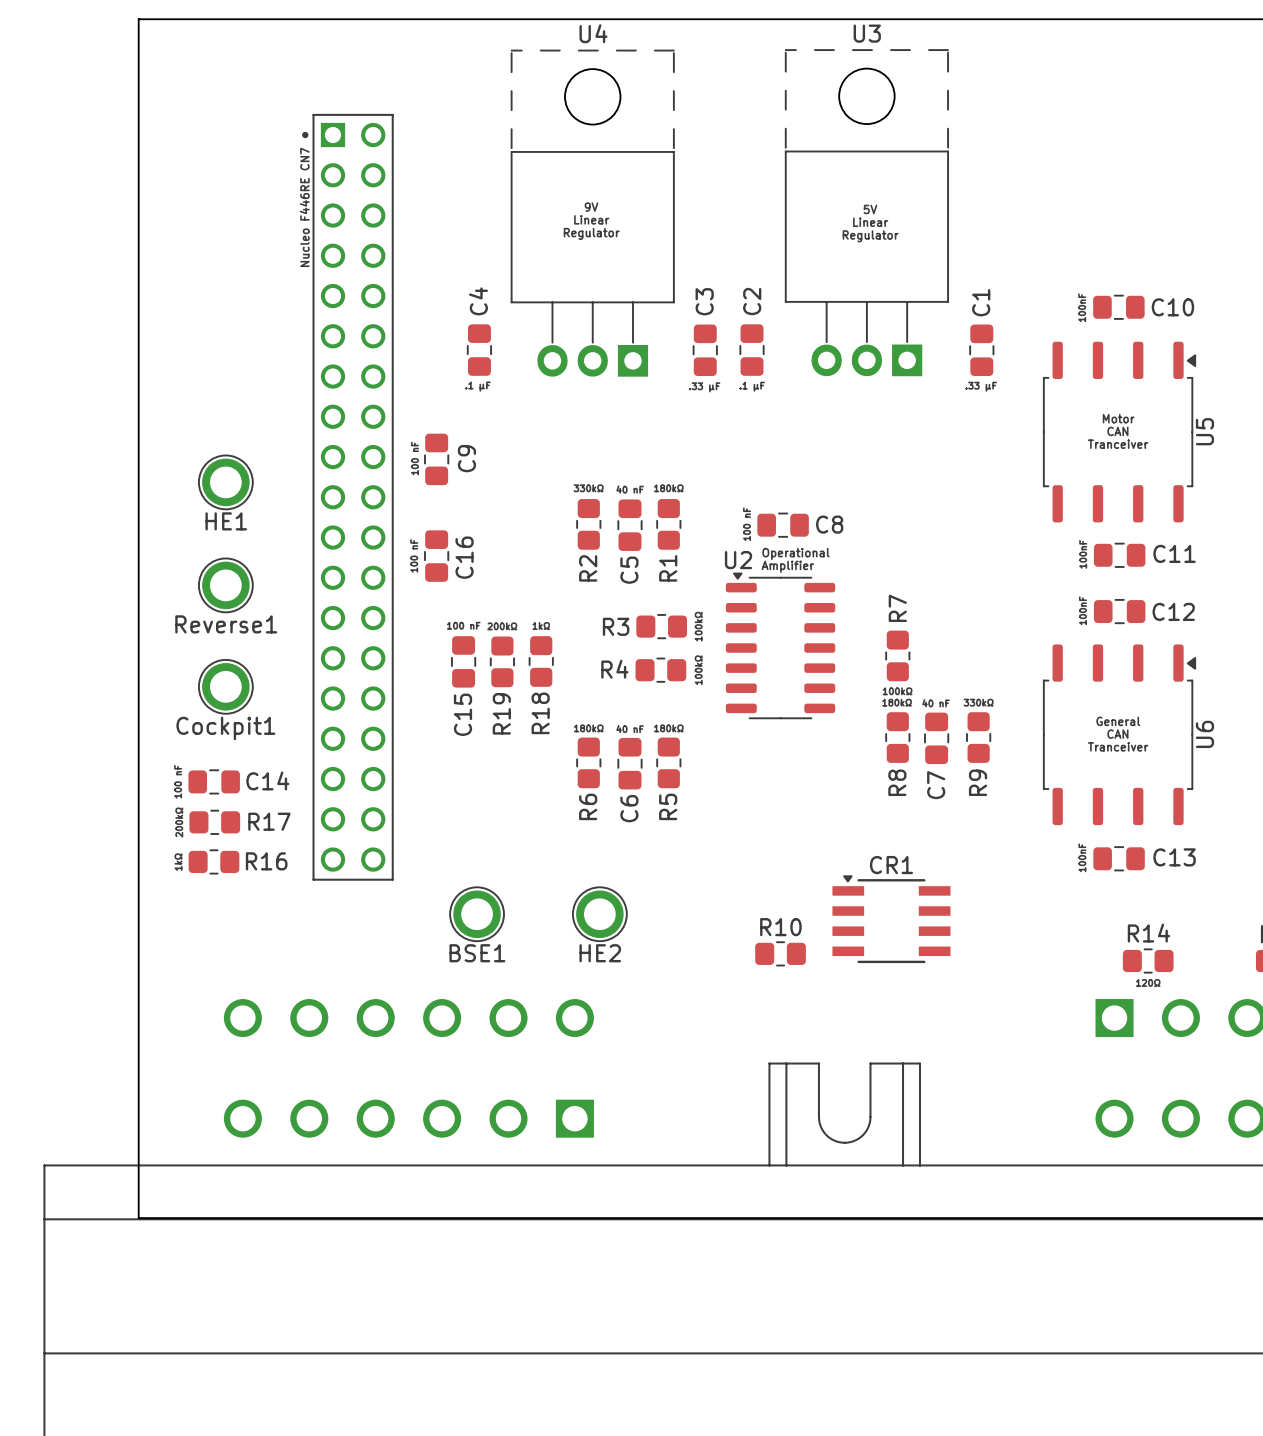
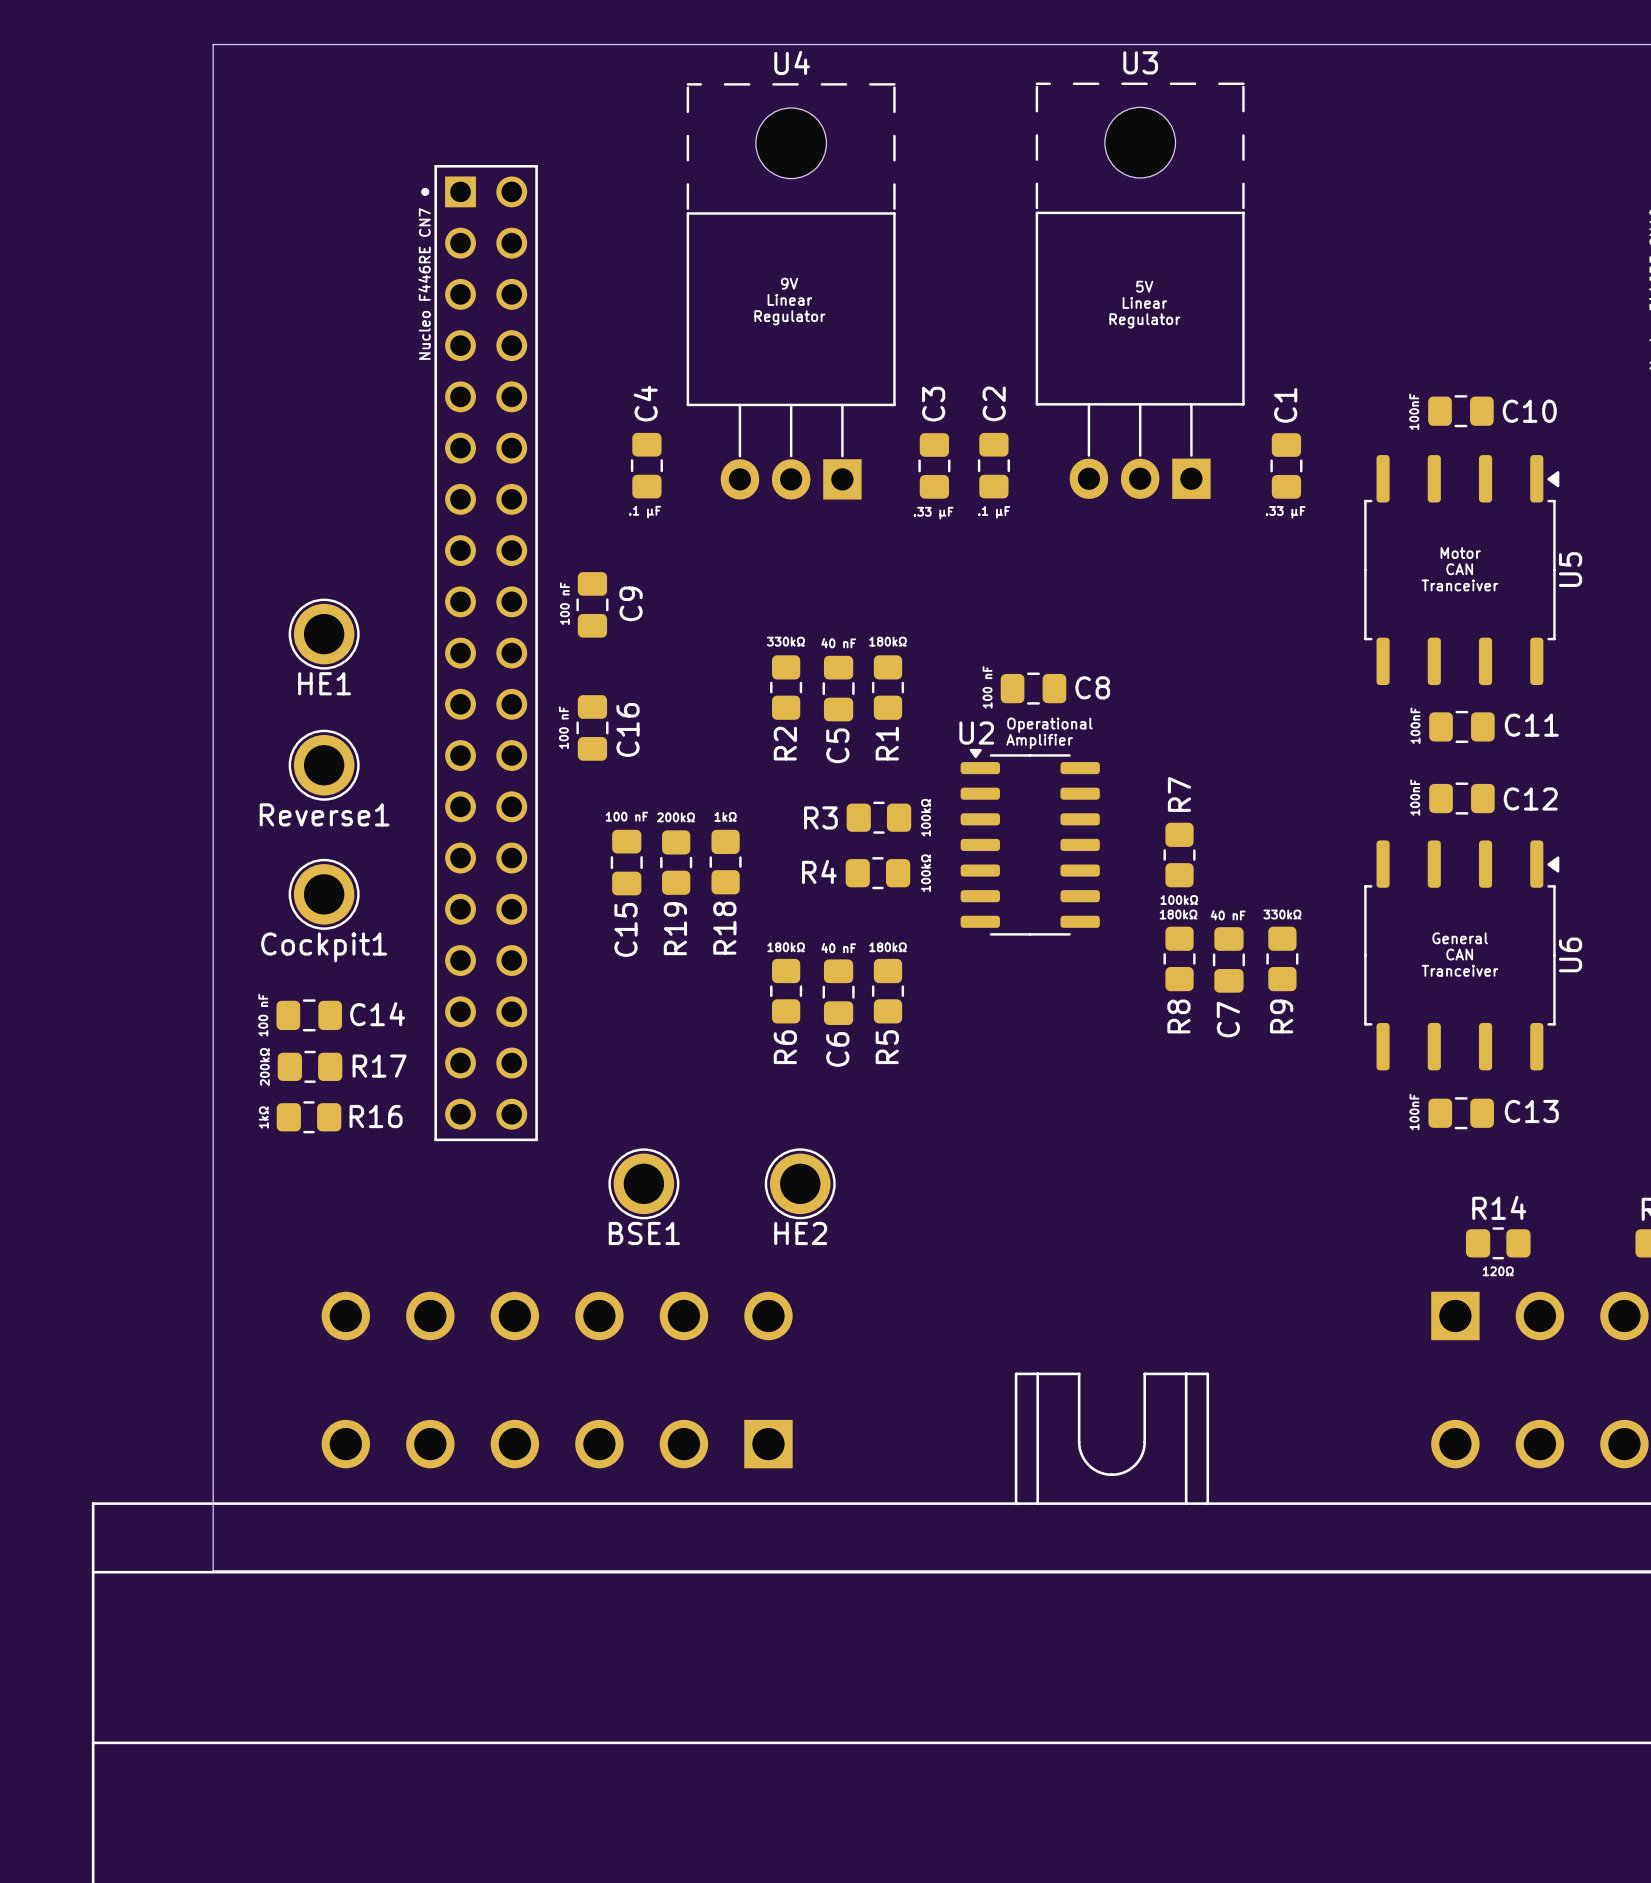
CR1: (891, 919) -> none
R10: (780, 953) -> none

